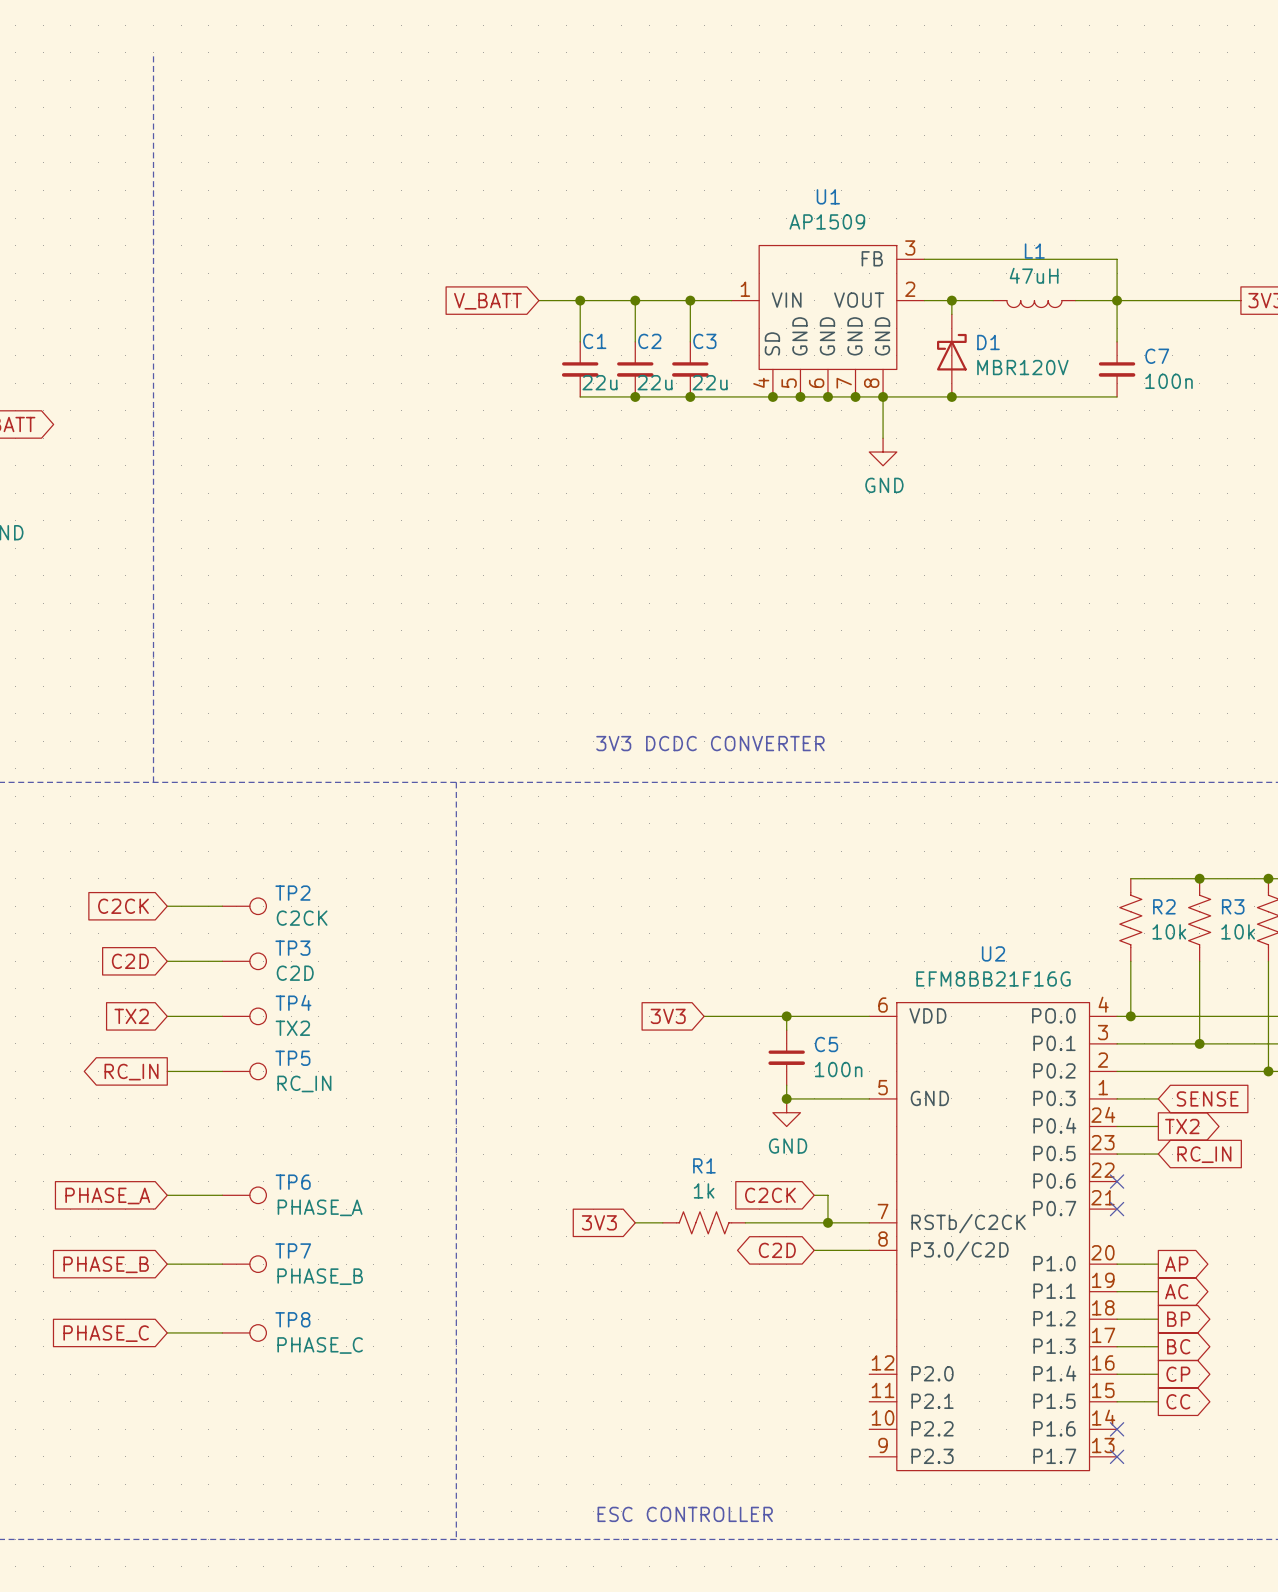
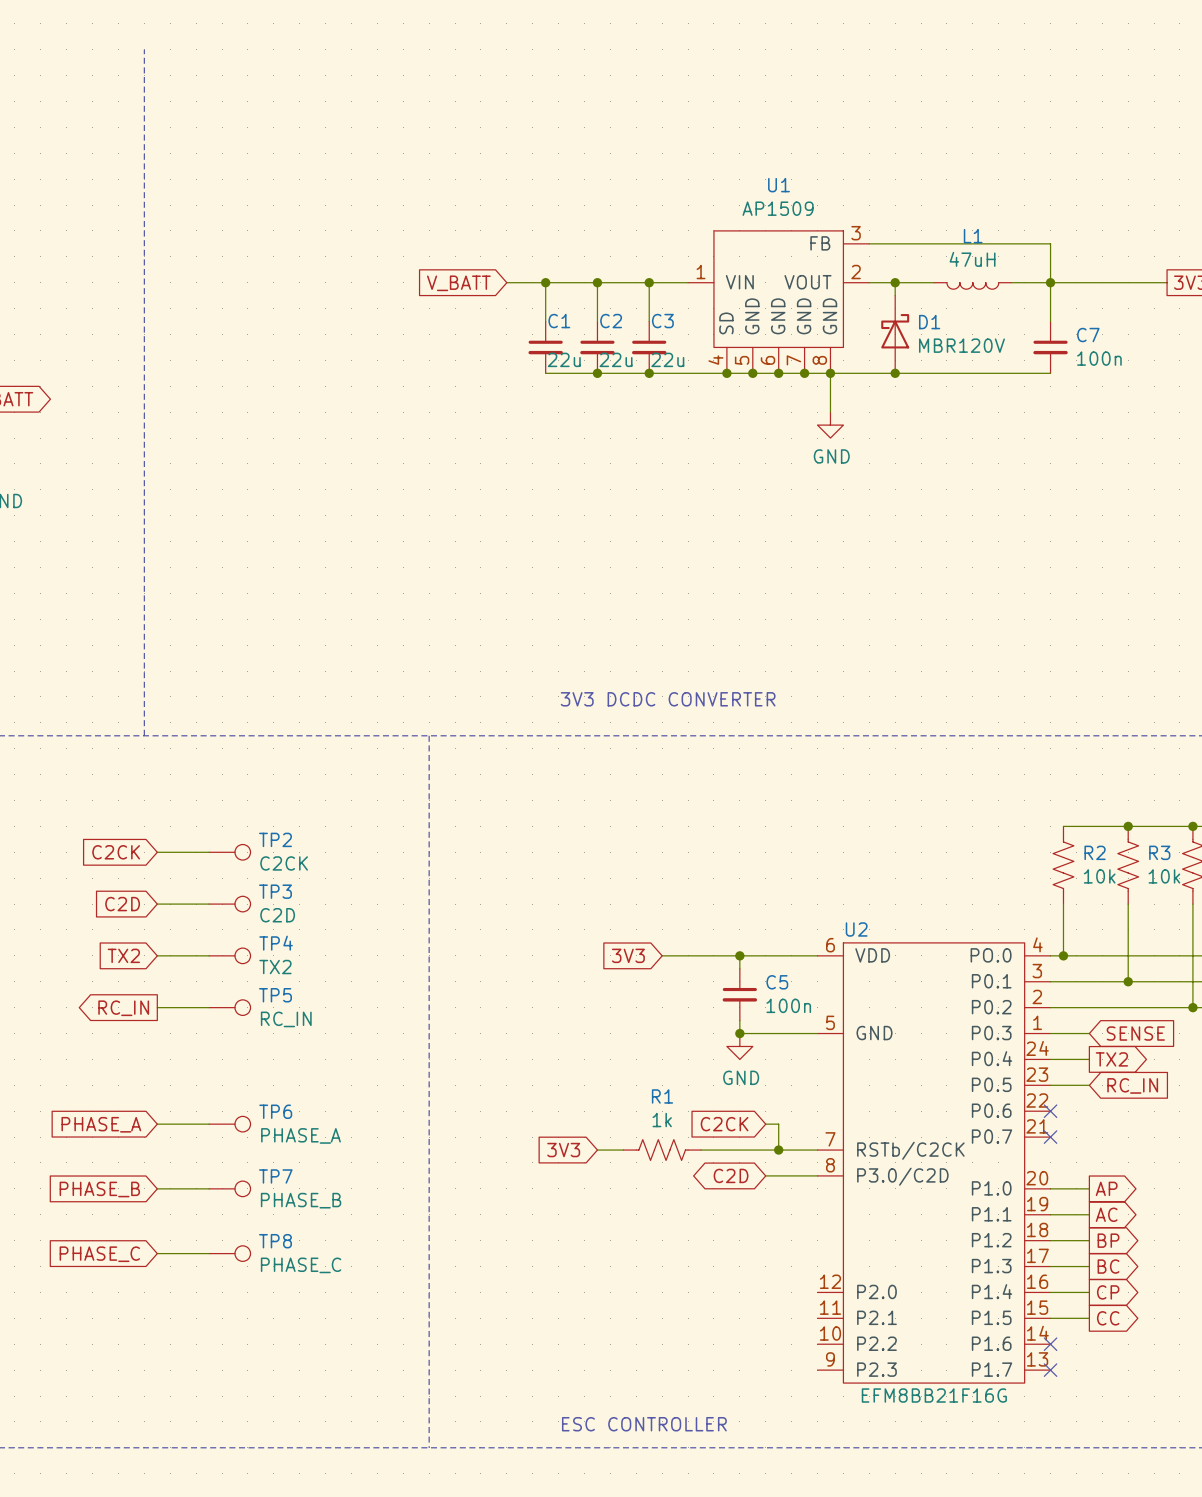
U2 name position: U2 (993, 953) -> U2 (856, 929)
U2 value position: EFM8BB21F16G (993, 978) -> EFM8BB21F16G (934, 1395)

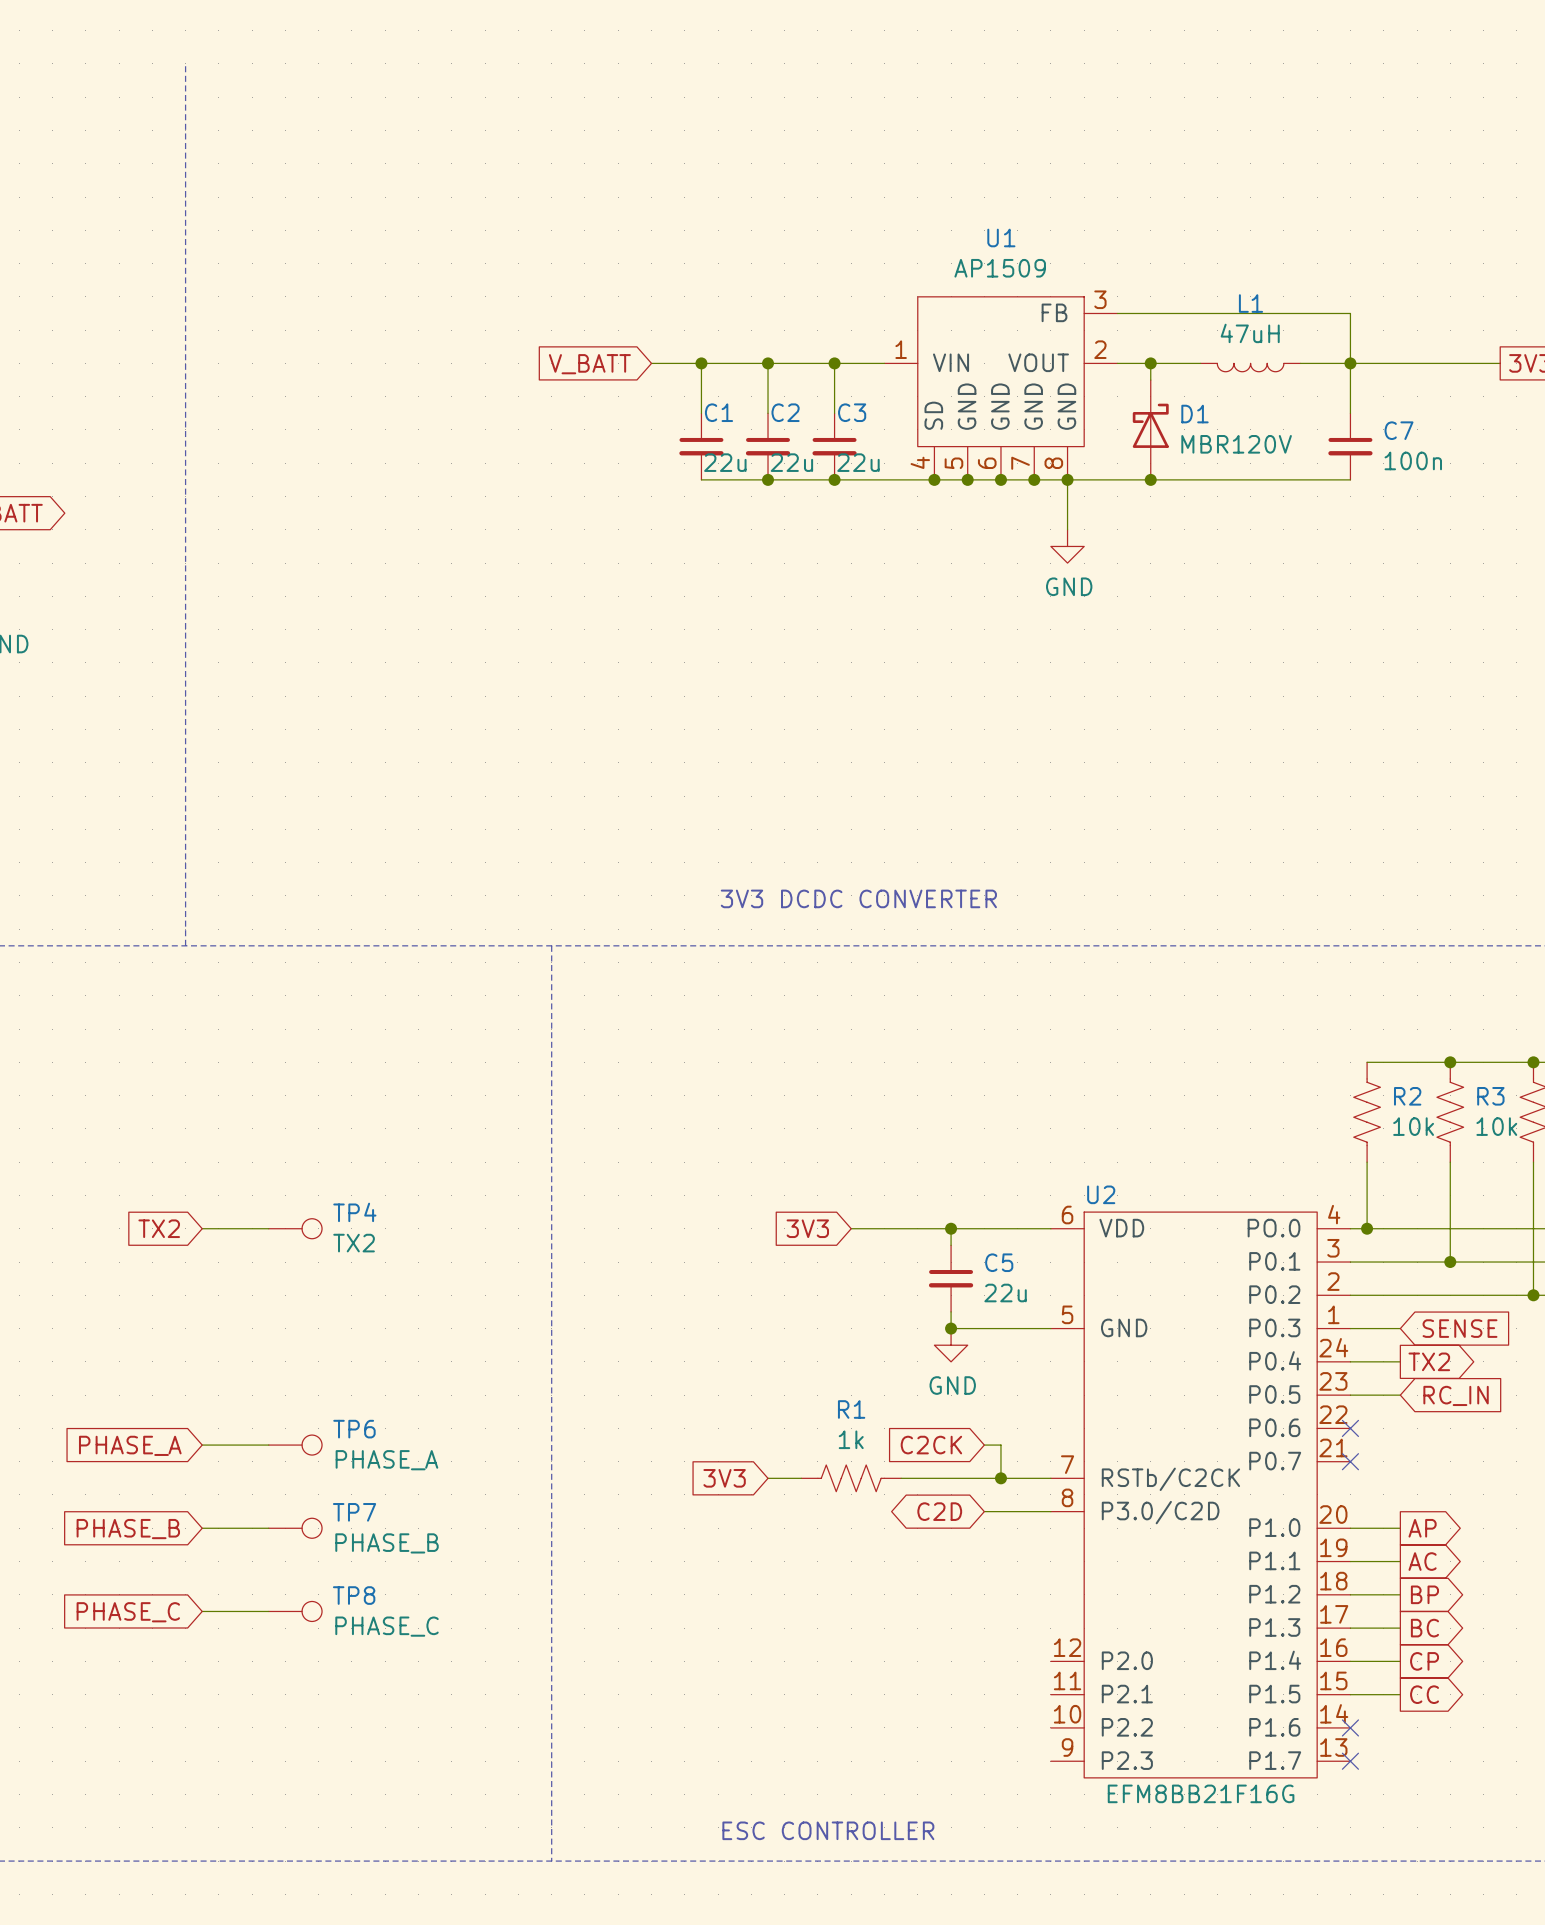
global label: C2CK (116, 852) -> none
wire: (157, 852) (209, 852) -> none
TP2: C2CK (229, 852) -> none
global label: C2D (122, 904) -> none
wire: (157, 904) (209, 904) -> none
TP3: C2D (229, 904) -> none
C5 value: 100n (788, 1005) -> 22u (1005, 1293)
wire: (157, 1007) (209, 1007) -> none
TP5: RC_IN (229, 1007) -> none
global label: RC_IN (123, 1008) -> none

